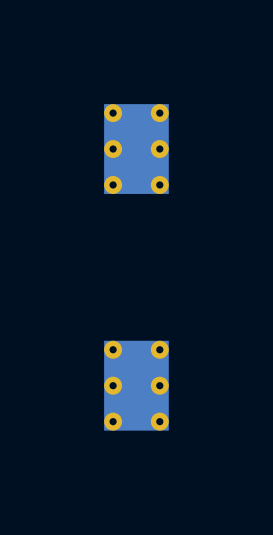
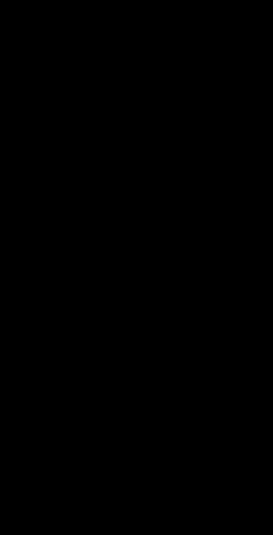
part: (136, 149) -> none
part: (136, 385) -> none

